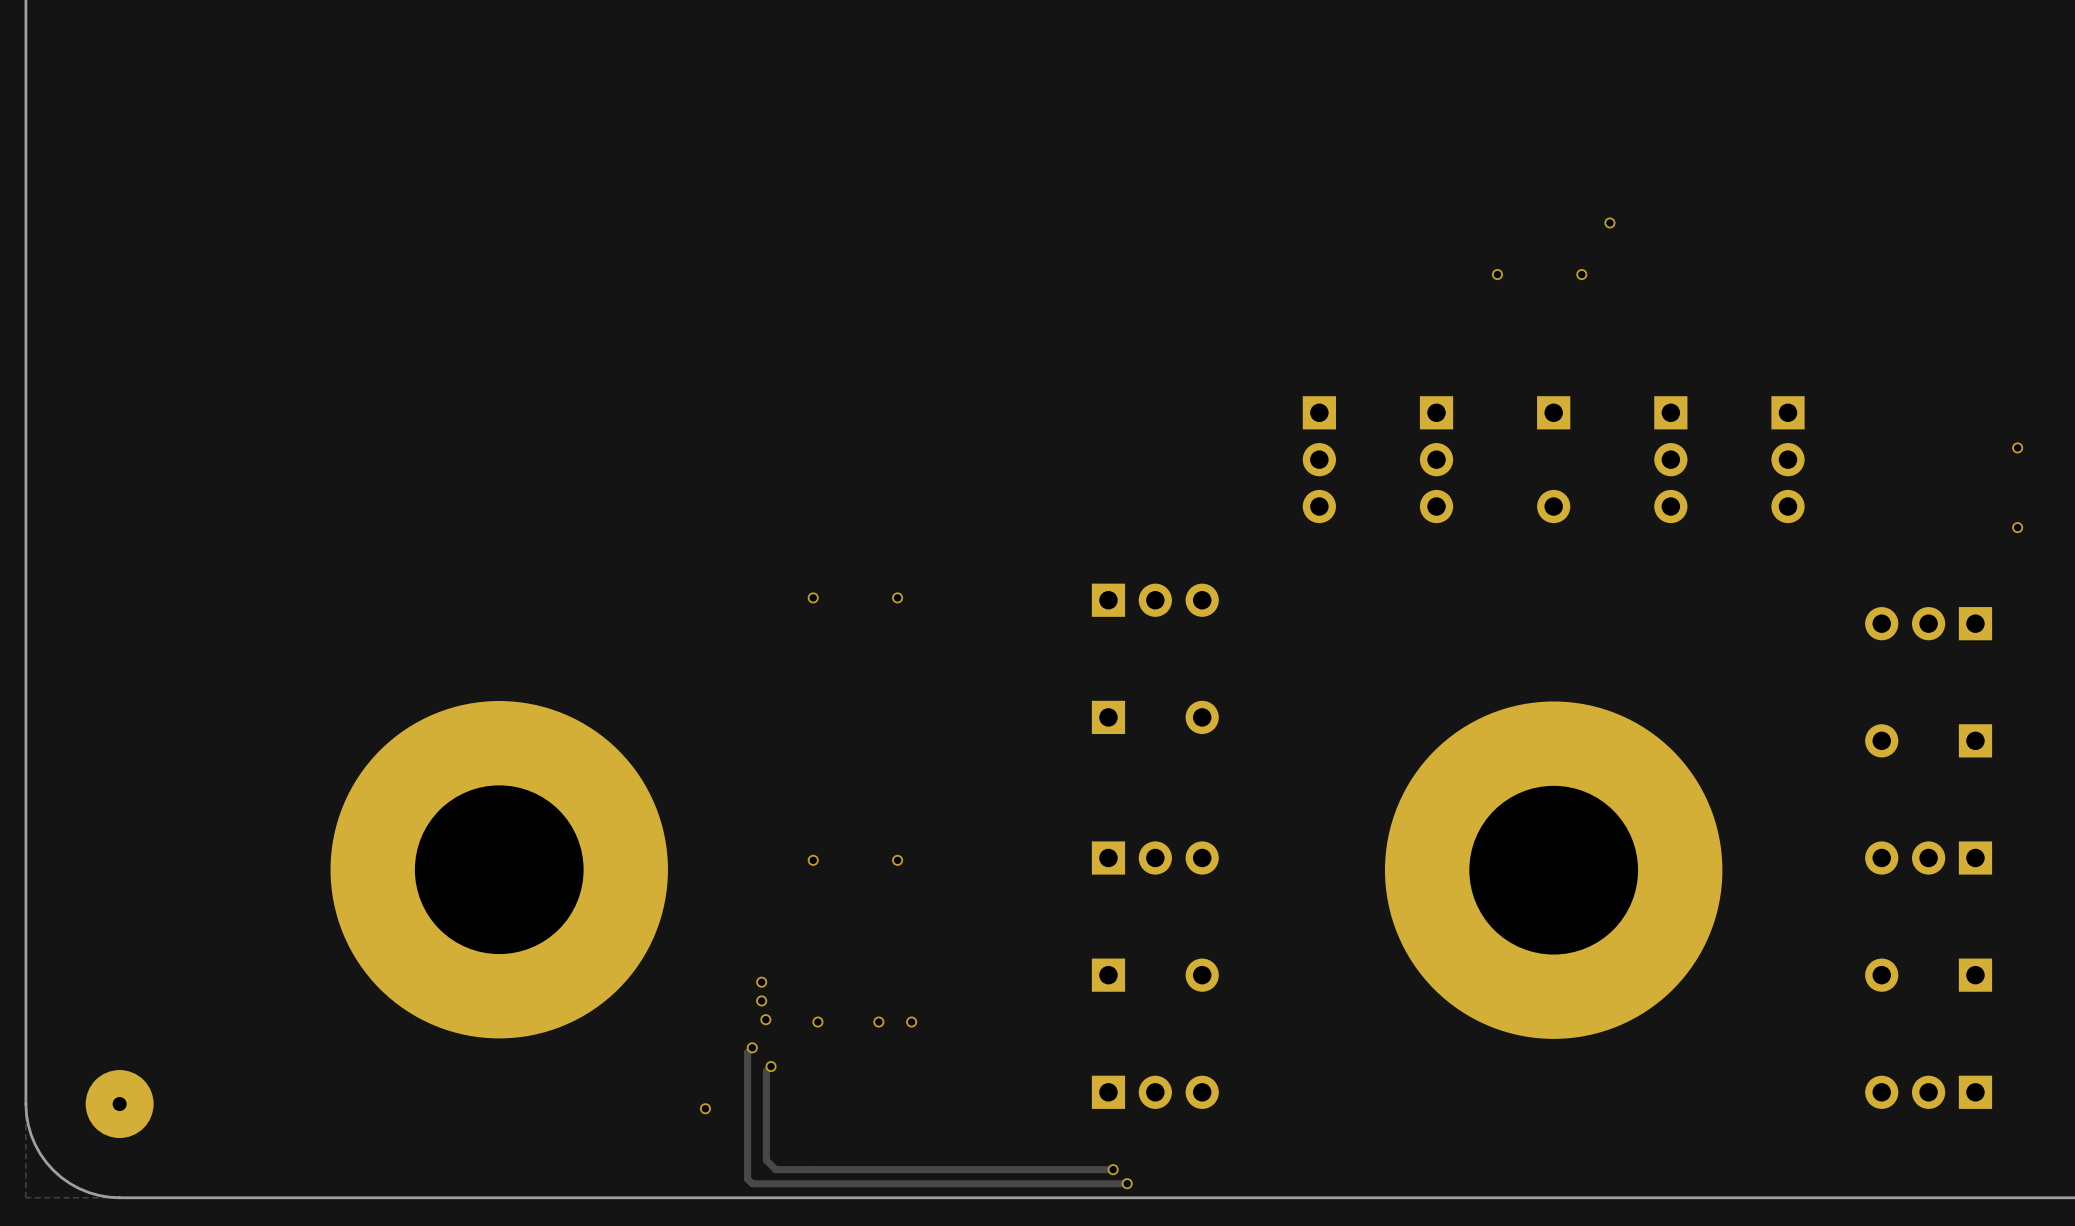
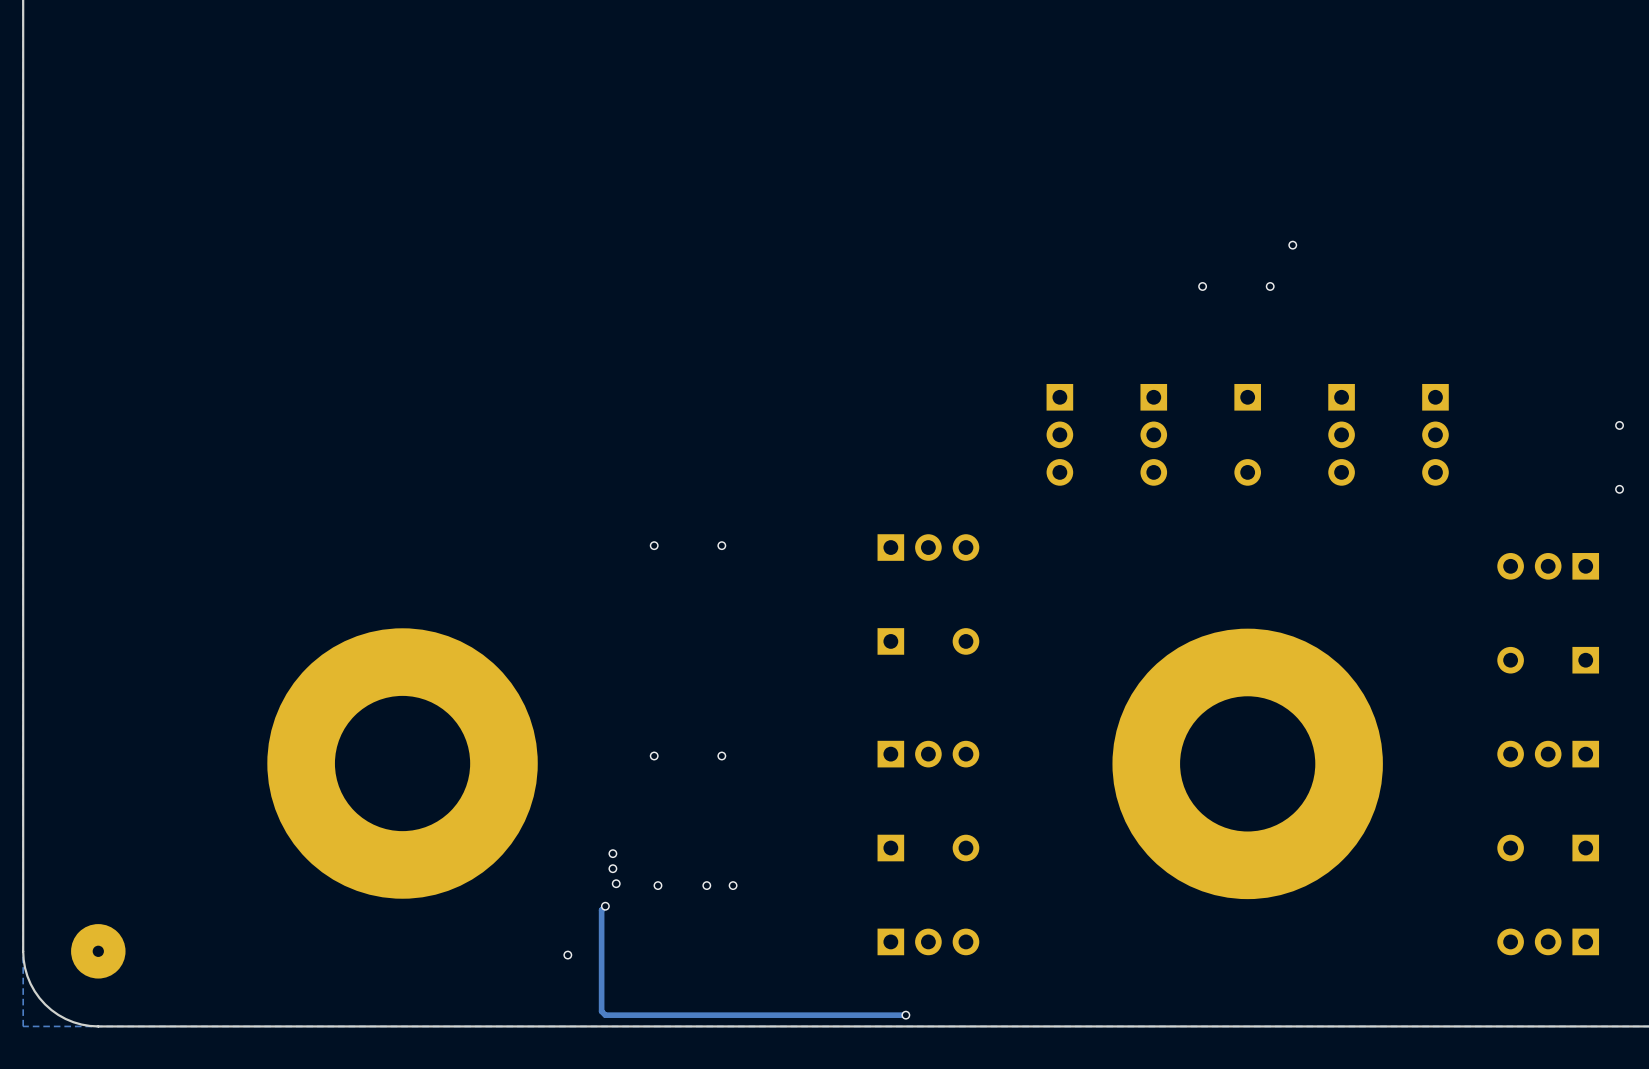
track: (771, 1066) (766, 1071) (766, 1160) (775, 1169) (1113, 1169) -> none
via: (771, 1066) -> none
via: (1113, 1169) -> none

